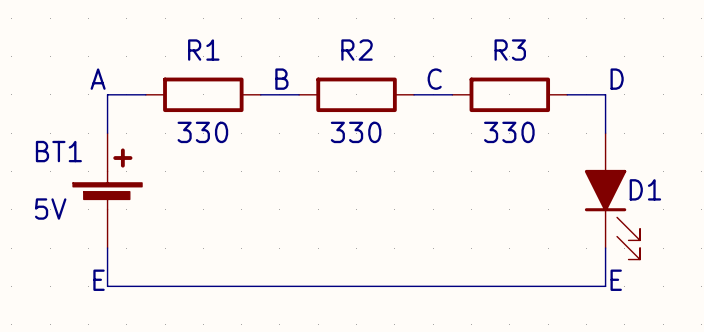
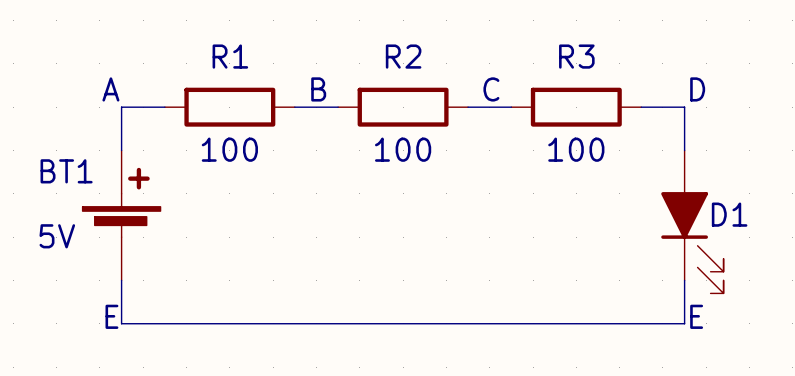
R1 value: 330 (202, 132) -> 100 (229, 149)
R2 value: 330 (356, 132) -> 100 (403, 149)
R3 value: 330 (509, 132) -> 100 (576, 149)

